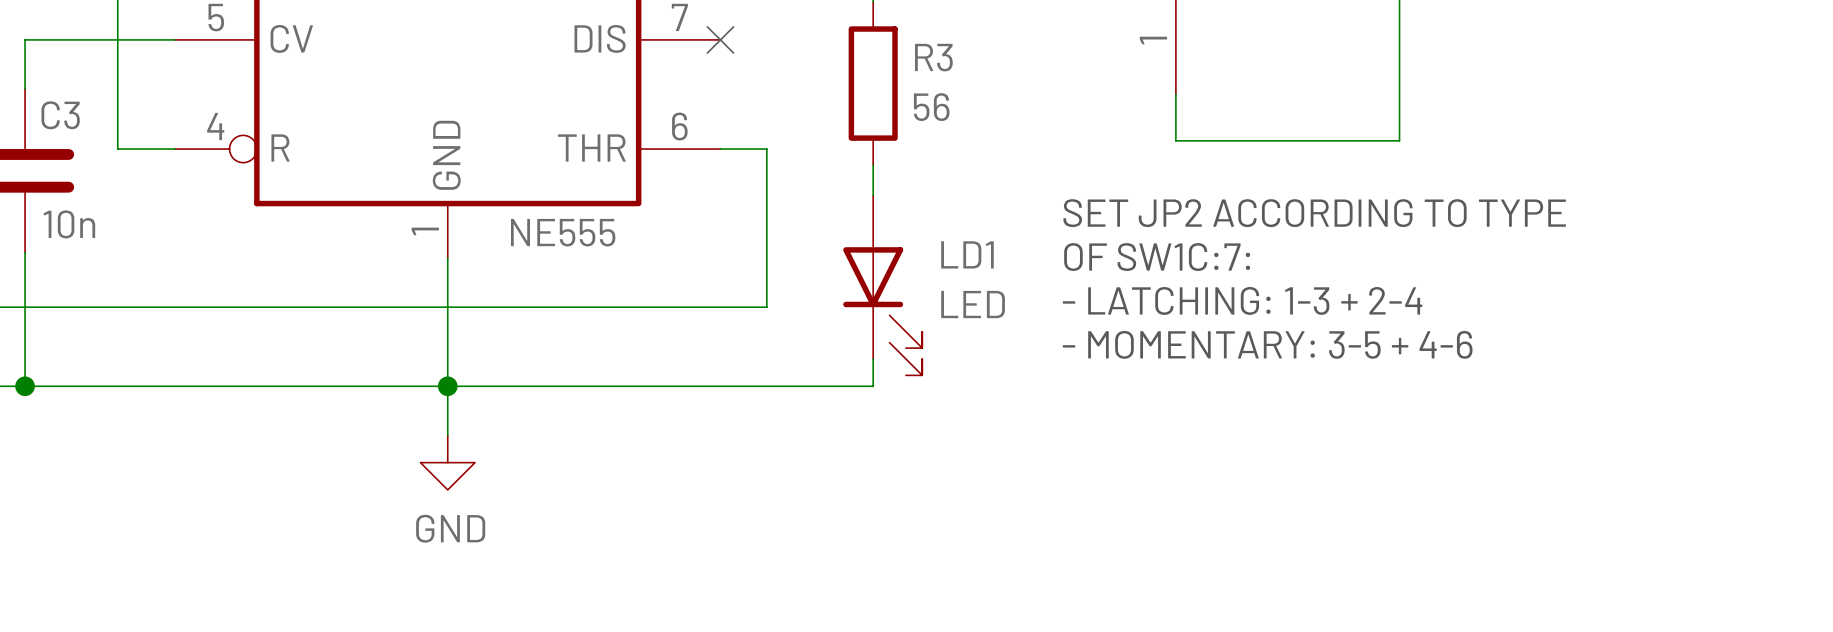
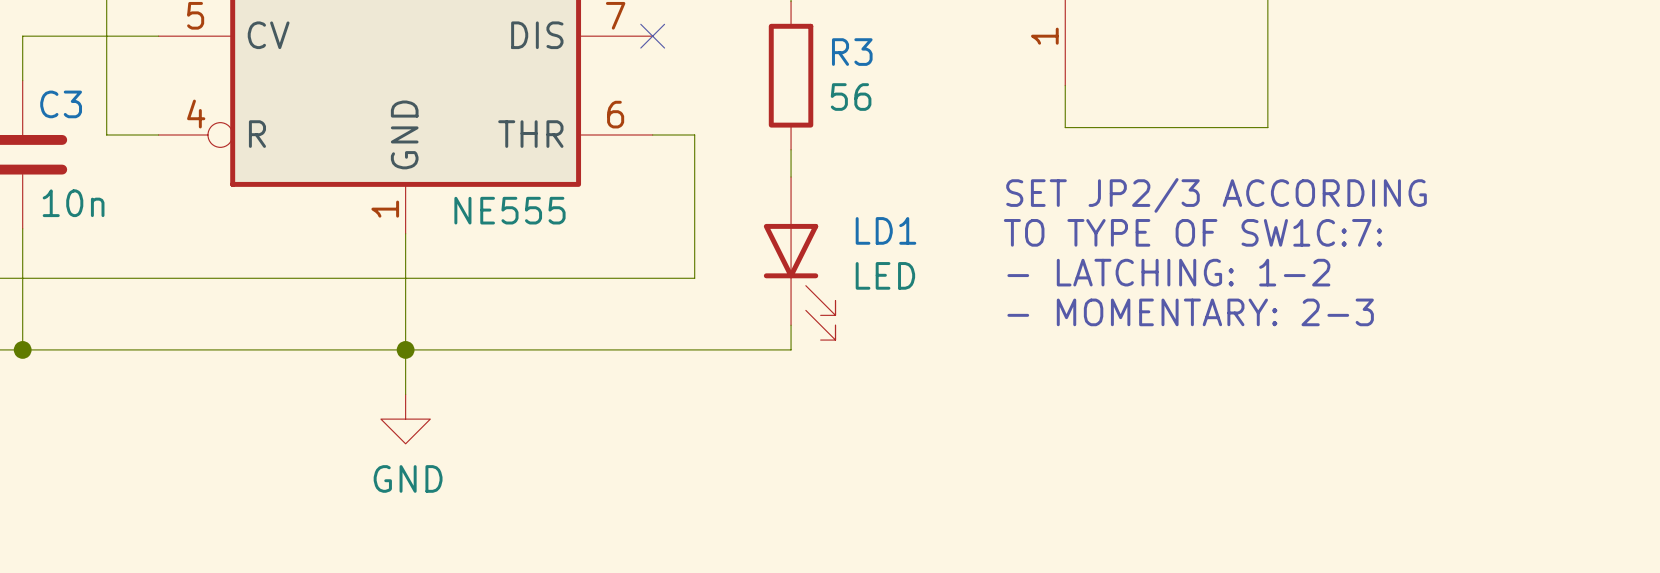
text: SET JP2 ACCORDING TO TYPE (1314, 213) -> SET JP2/3 ACCORDING (1216, 195)
text: OF SW1C:7: (1157, 257) -> TO TYPE OF SW1C:7: (1192, 232)
text: - LATCHING: 1-3 + 2-4 (1242, 300) -> - LATCHING: 1-2 (1168, 272)
text: - MOMENTARY: 3-5 + 4-6 (1267, 344) -> - MOMENTARY: 2-3 (1190, 312)

